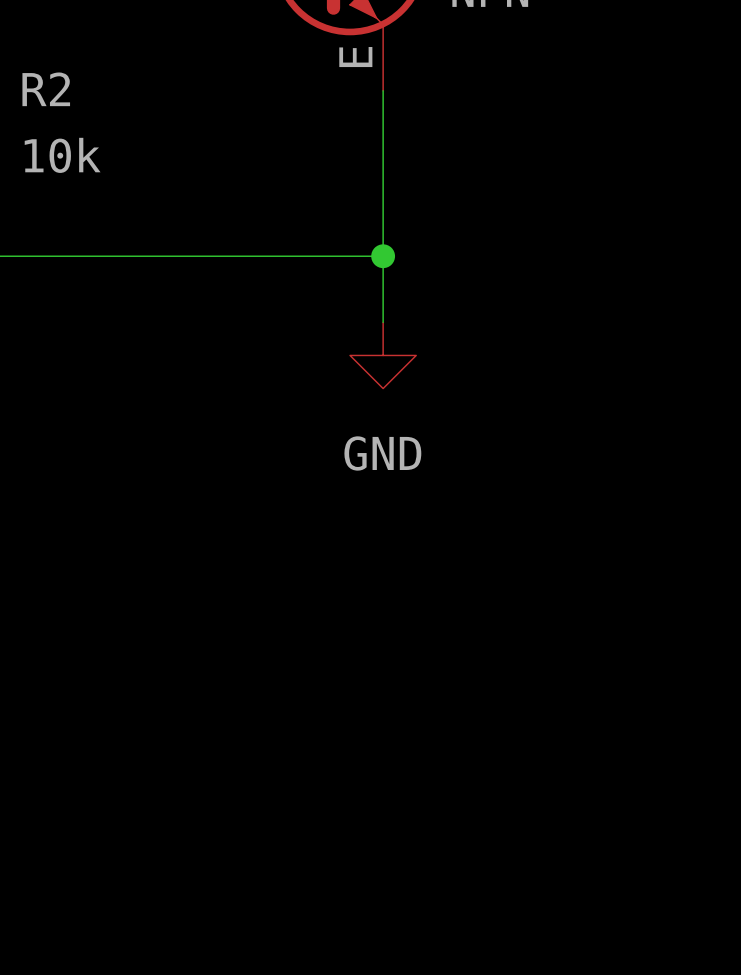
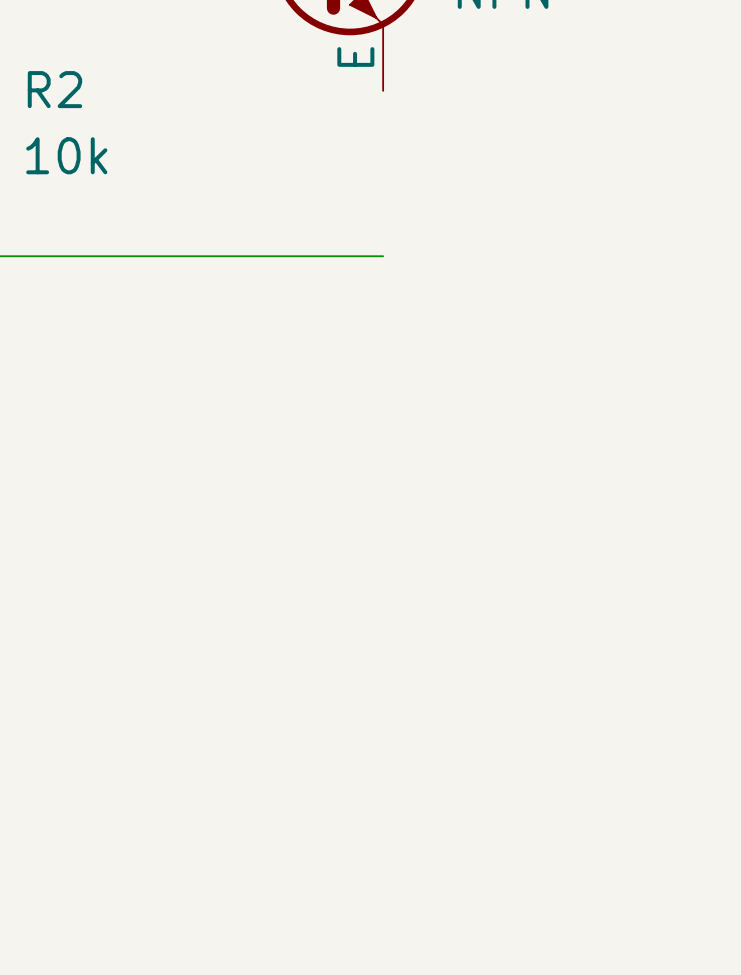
wire: (383, 90) (383, 322) -> none
junction: (383, 256) -> none
power symbol: GND (383, 355) -> none

